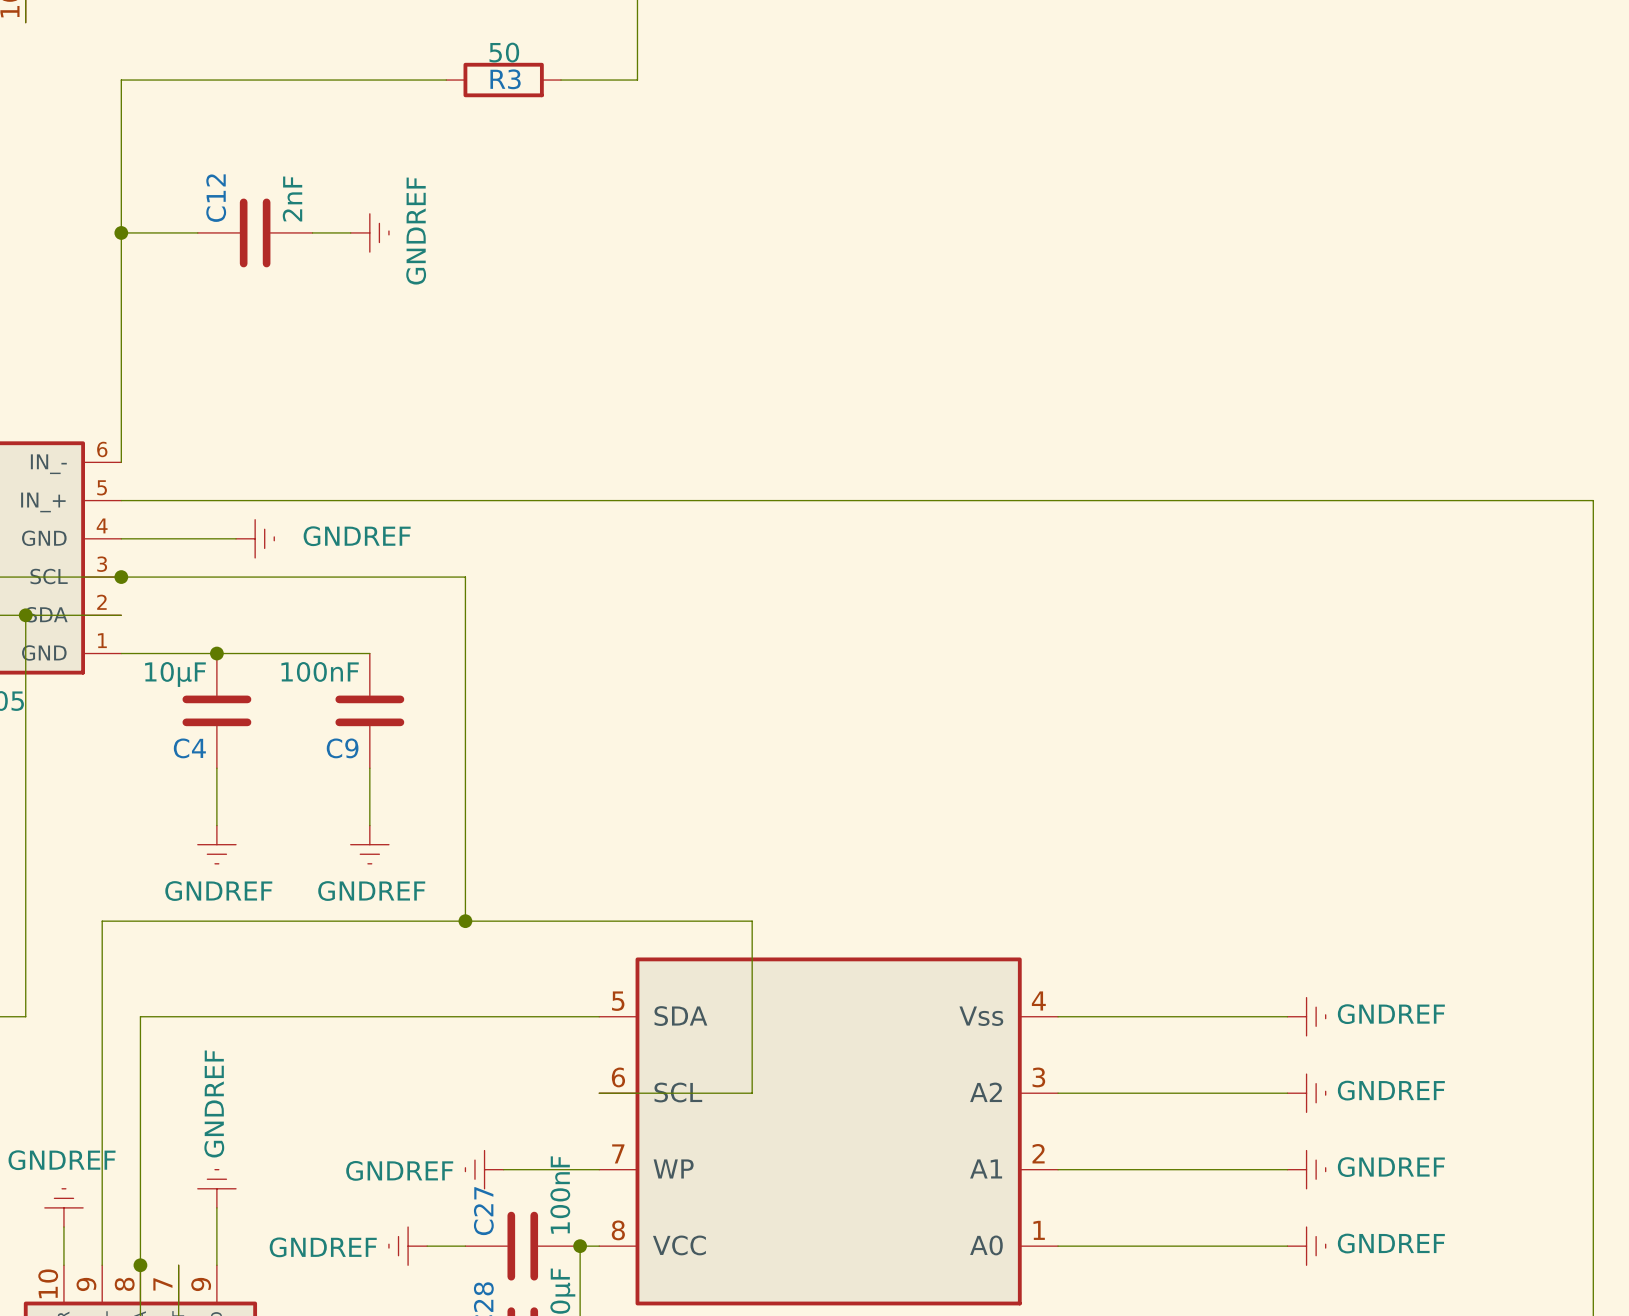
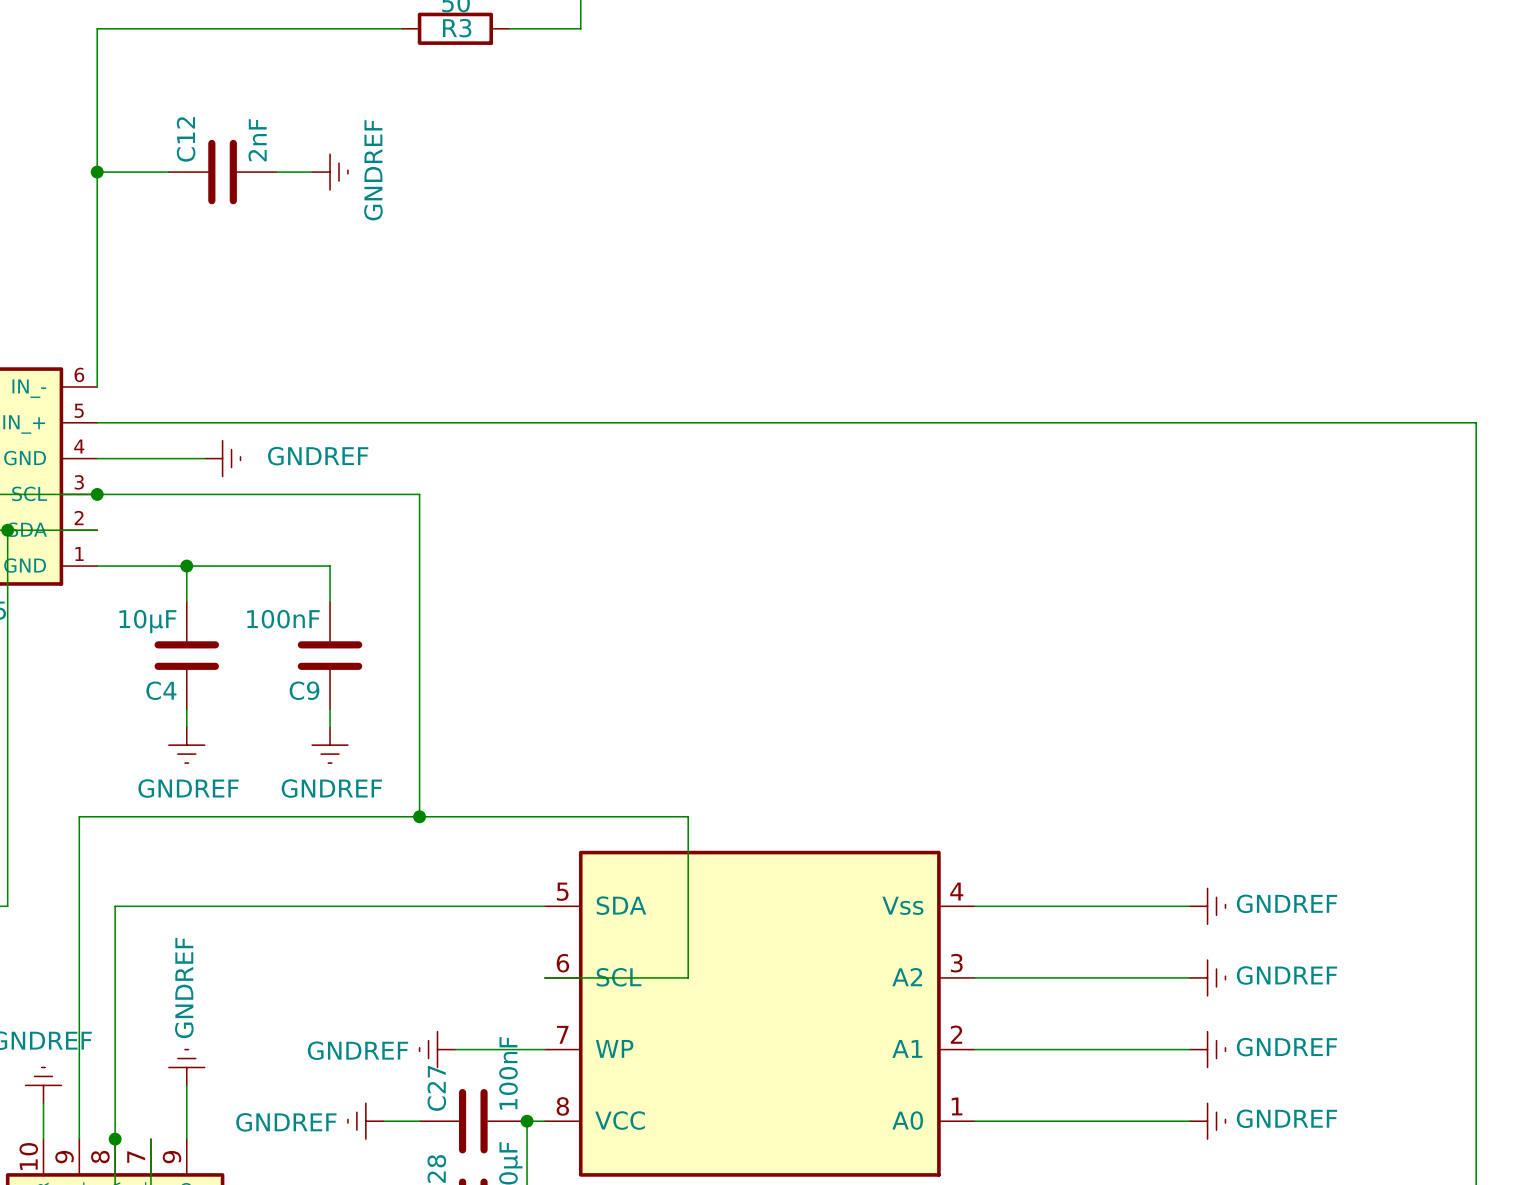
C4 position: (216, 710) -> (186, 655)
C9 position: (369, 710) -> (330, 655)

